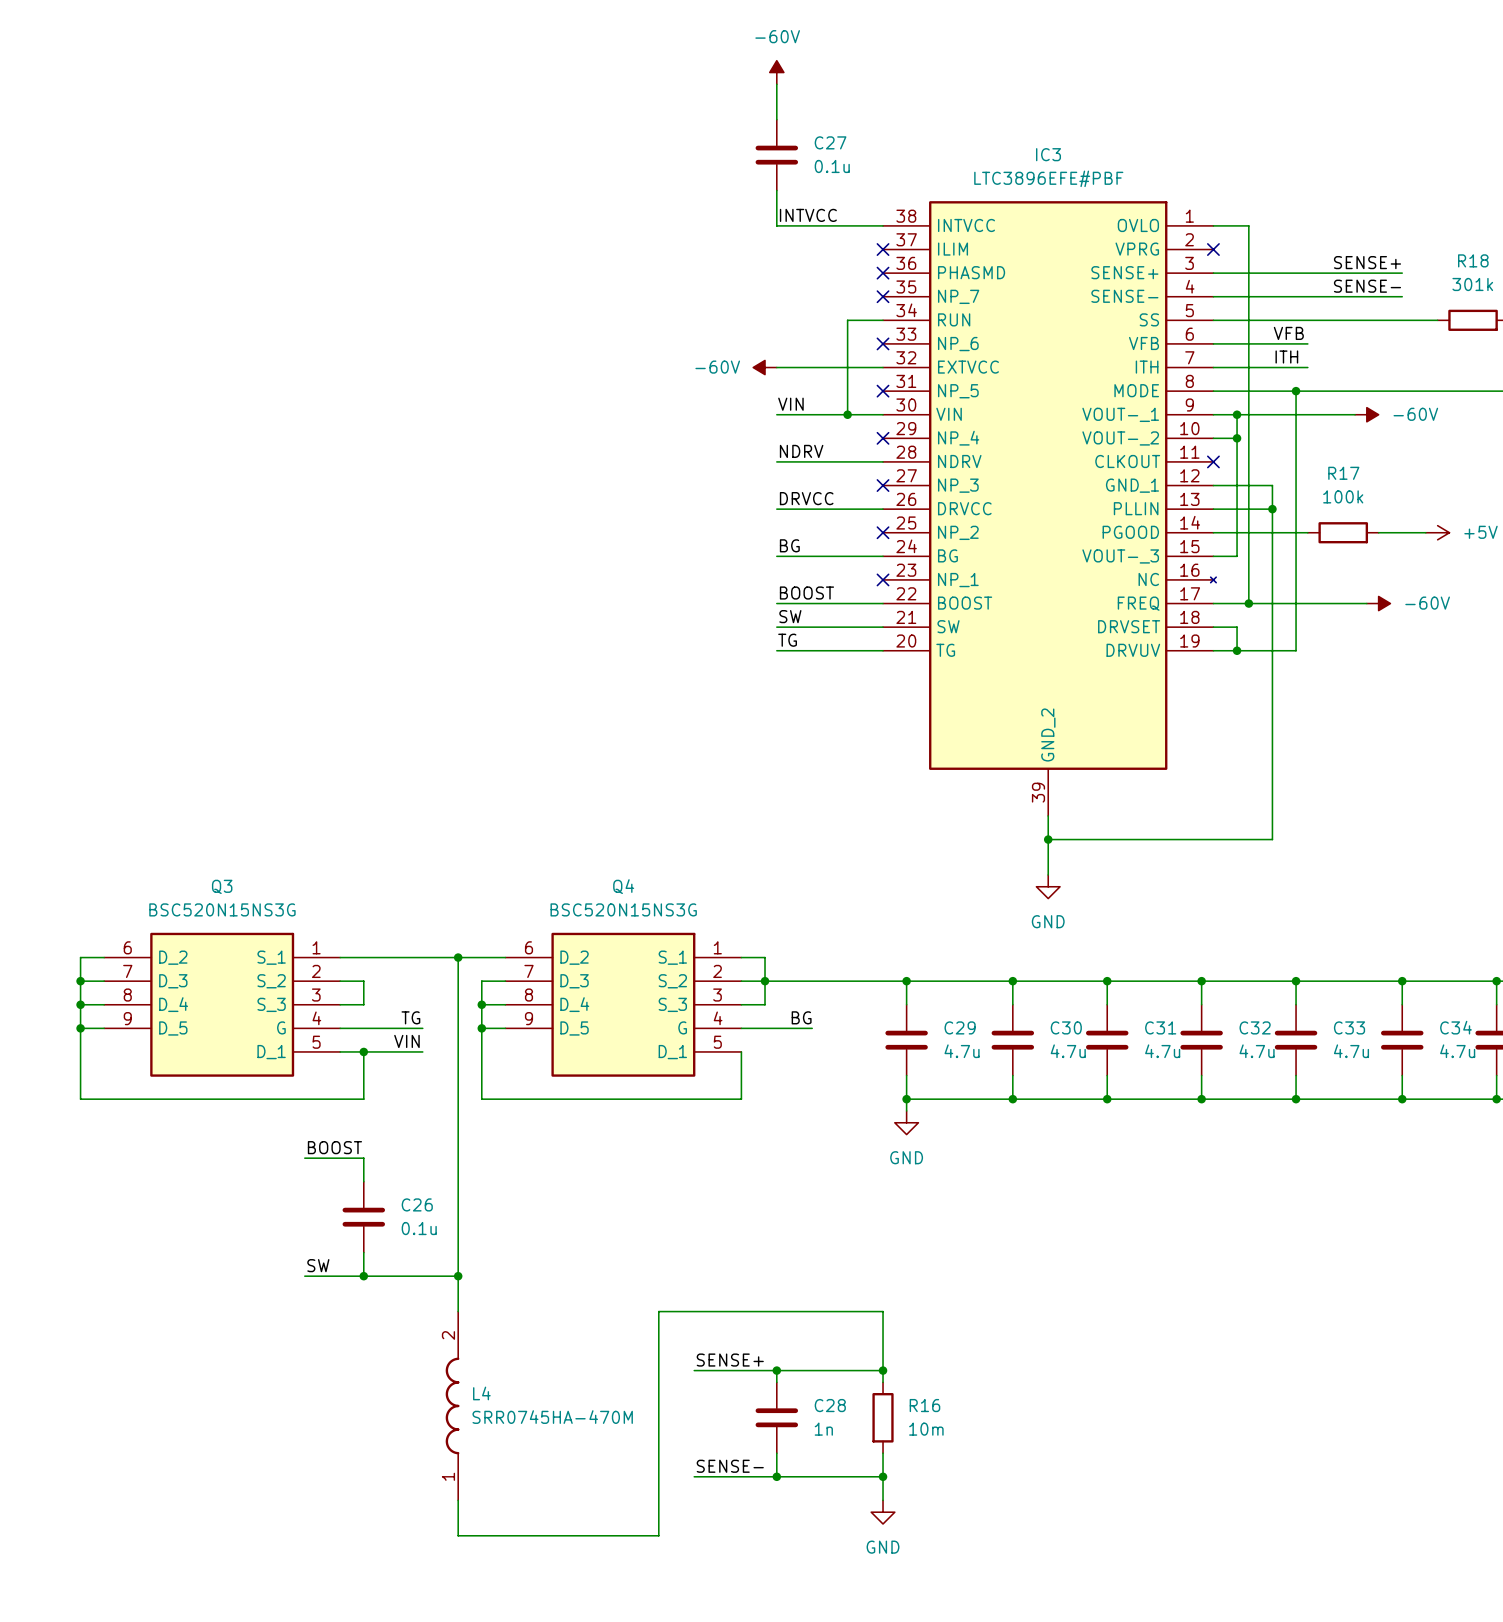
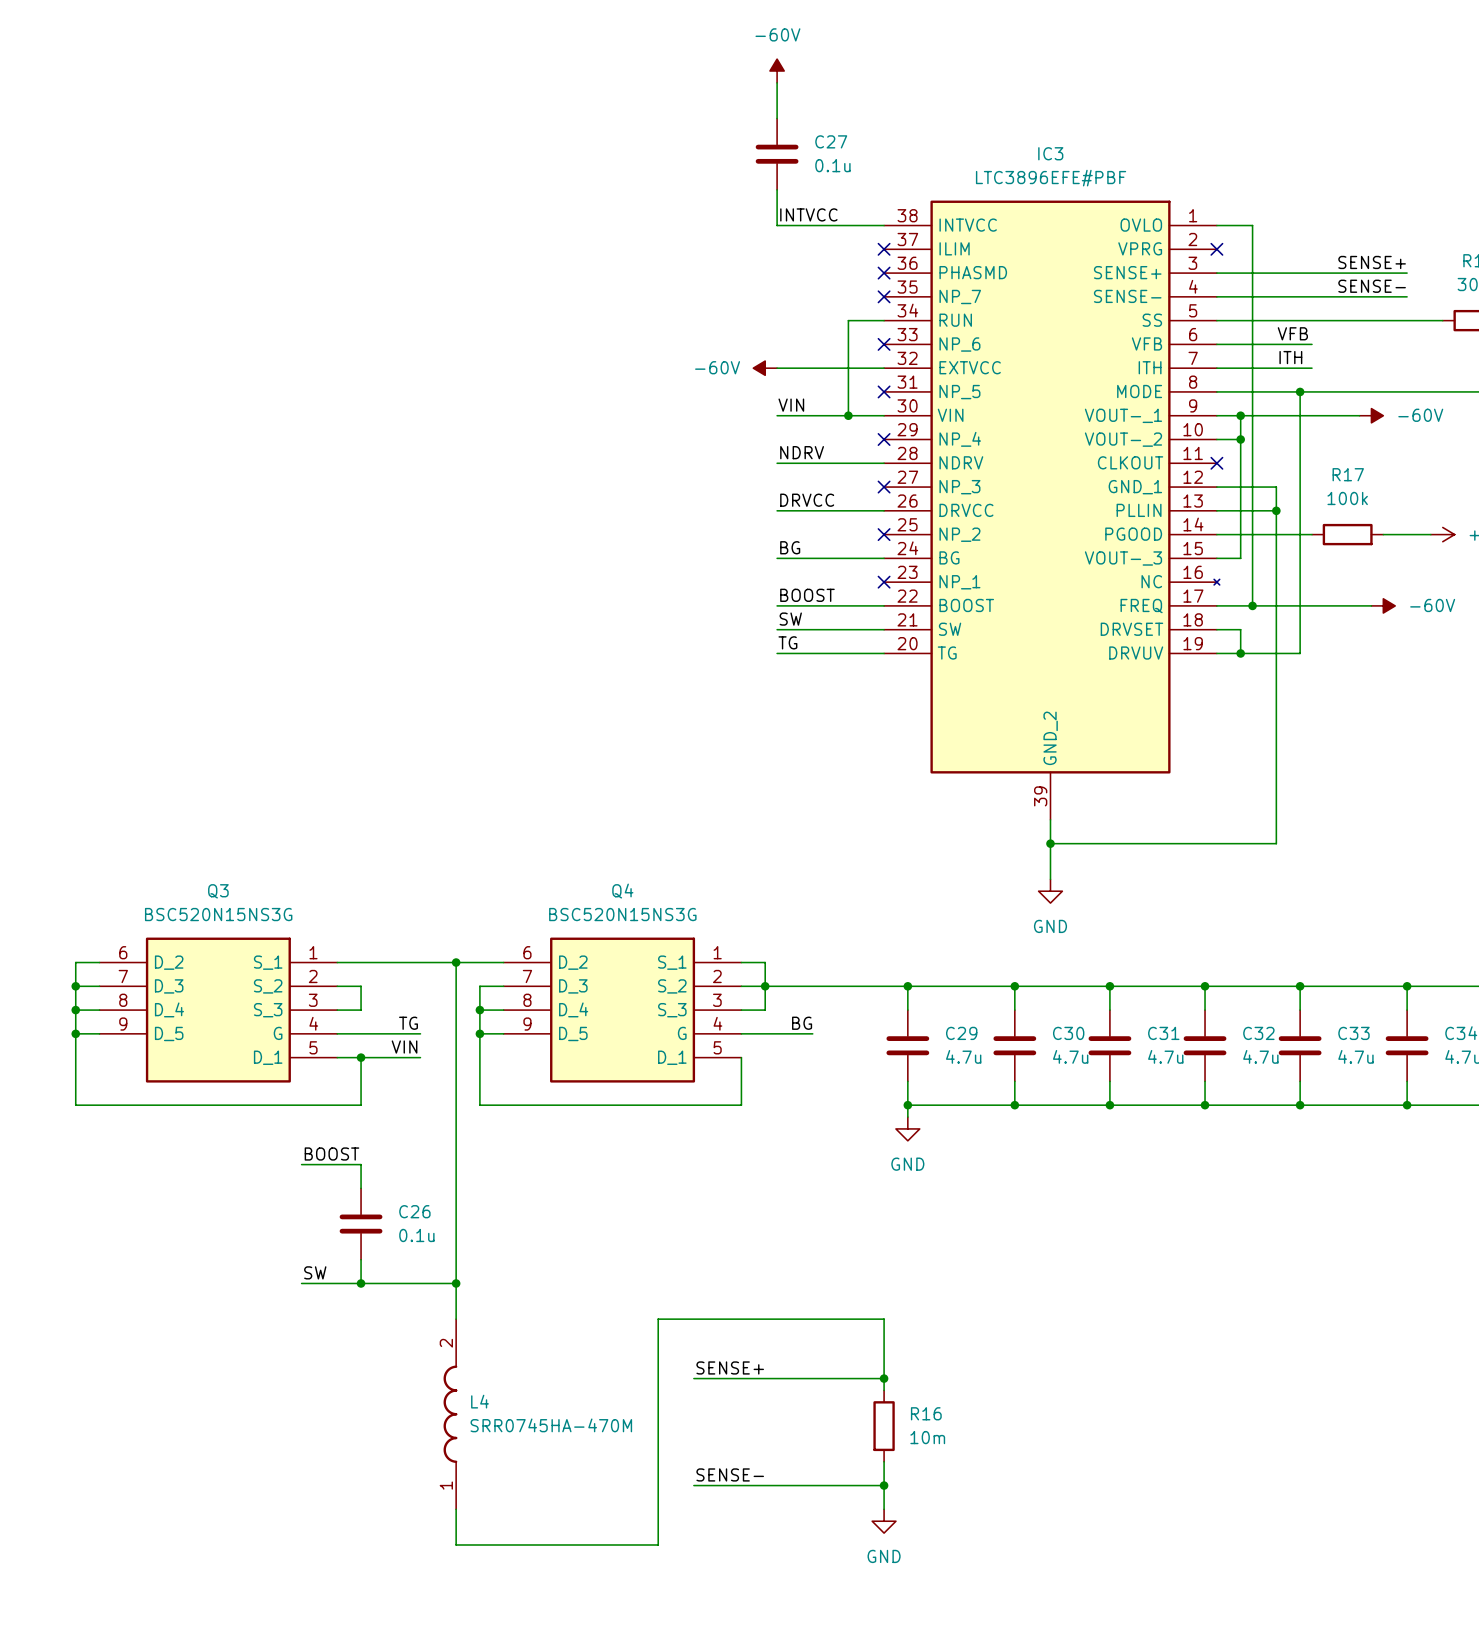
wire: (776, 1370) (776, 1382) -> none
junction: (776, 1370) -> none
C28: 1n (776, 1417) -> none
wire: (776, 1453) (776, 1476) -> none
junction: (776, 1476) -> none

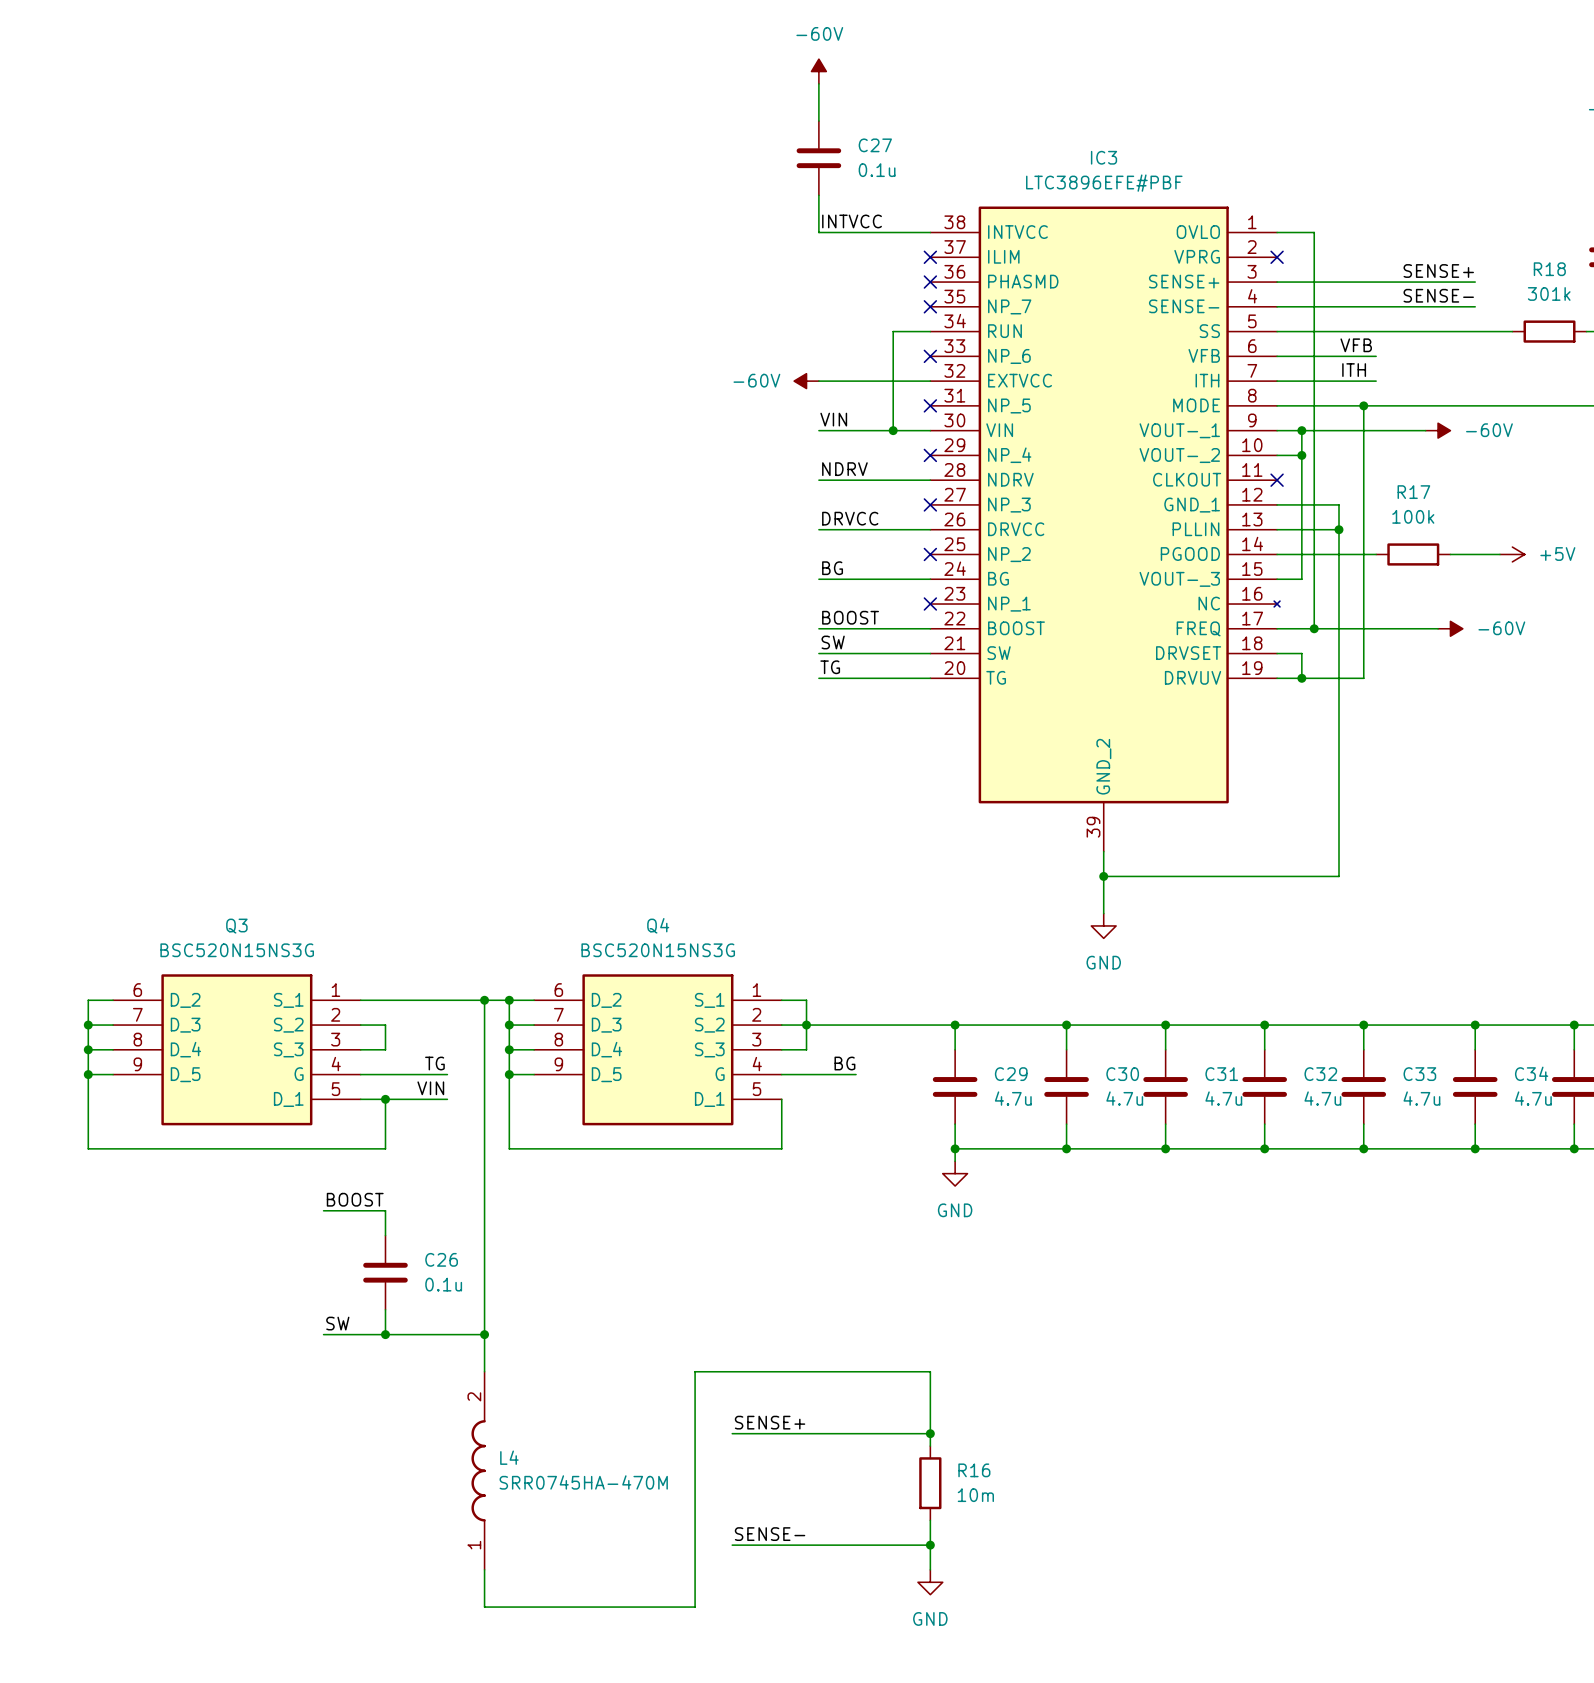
wire: none -> (509, 1000) (509, 1025)
junction: none -> (509, 1000)
junction: none -> (509, 1025)

